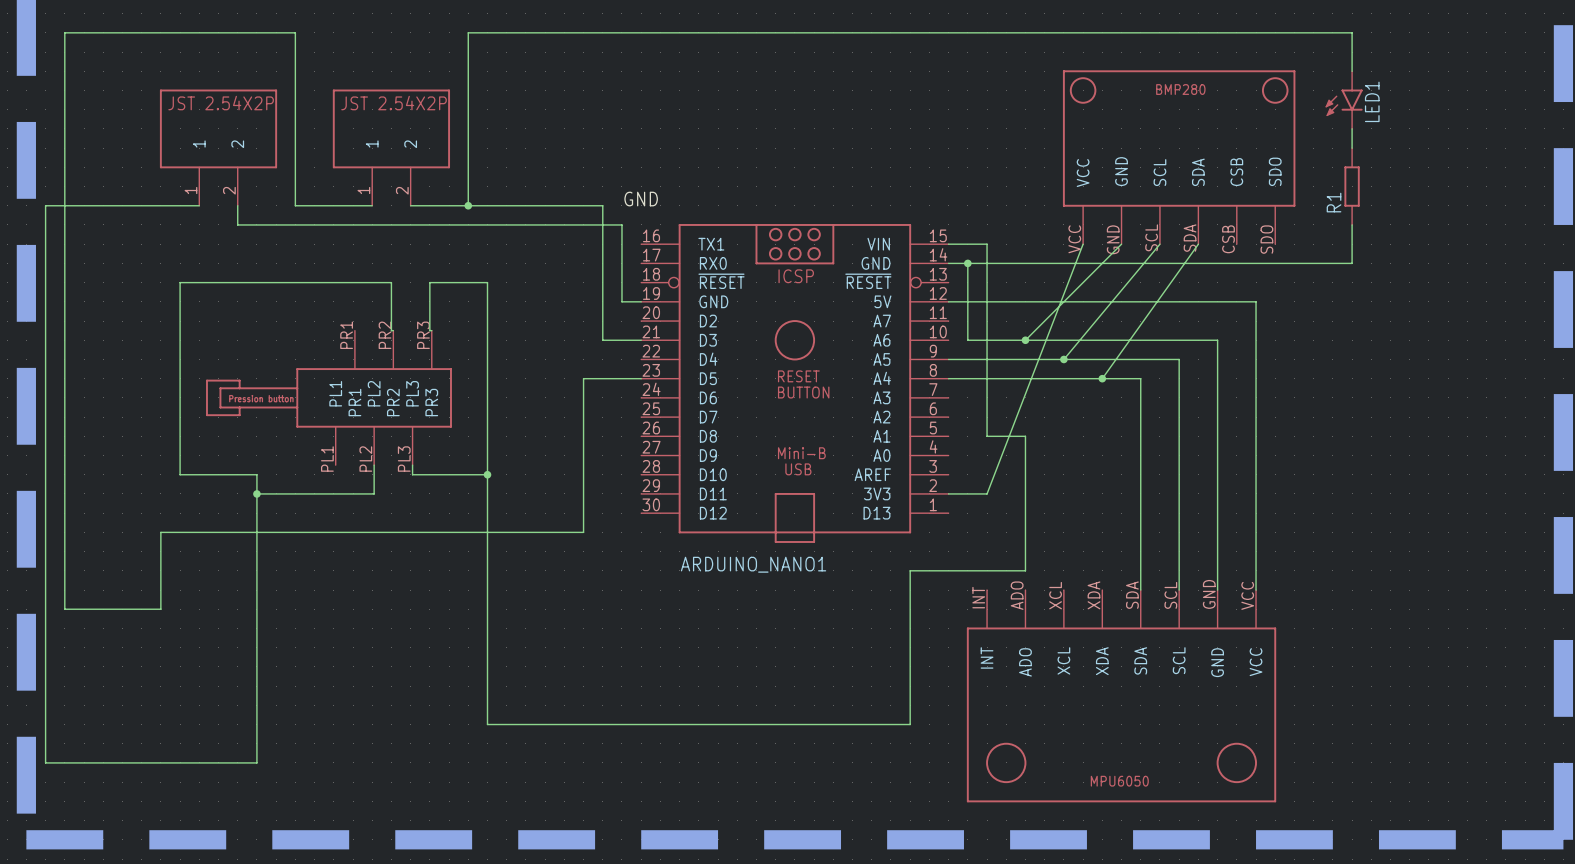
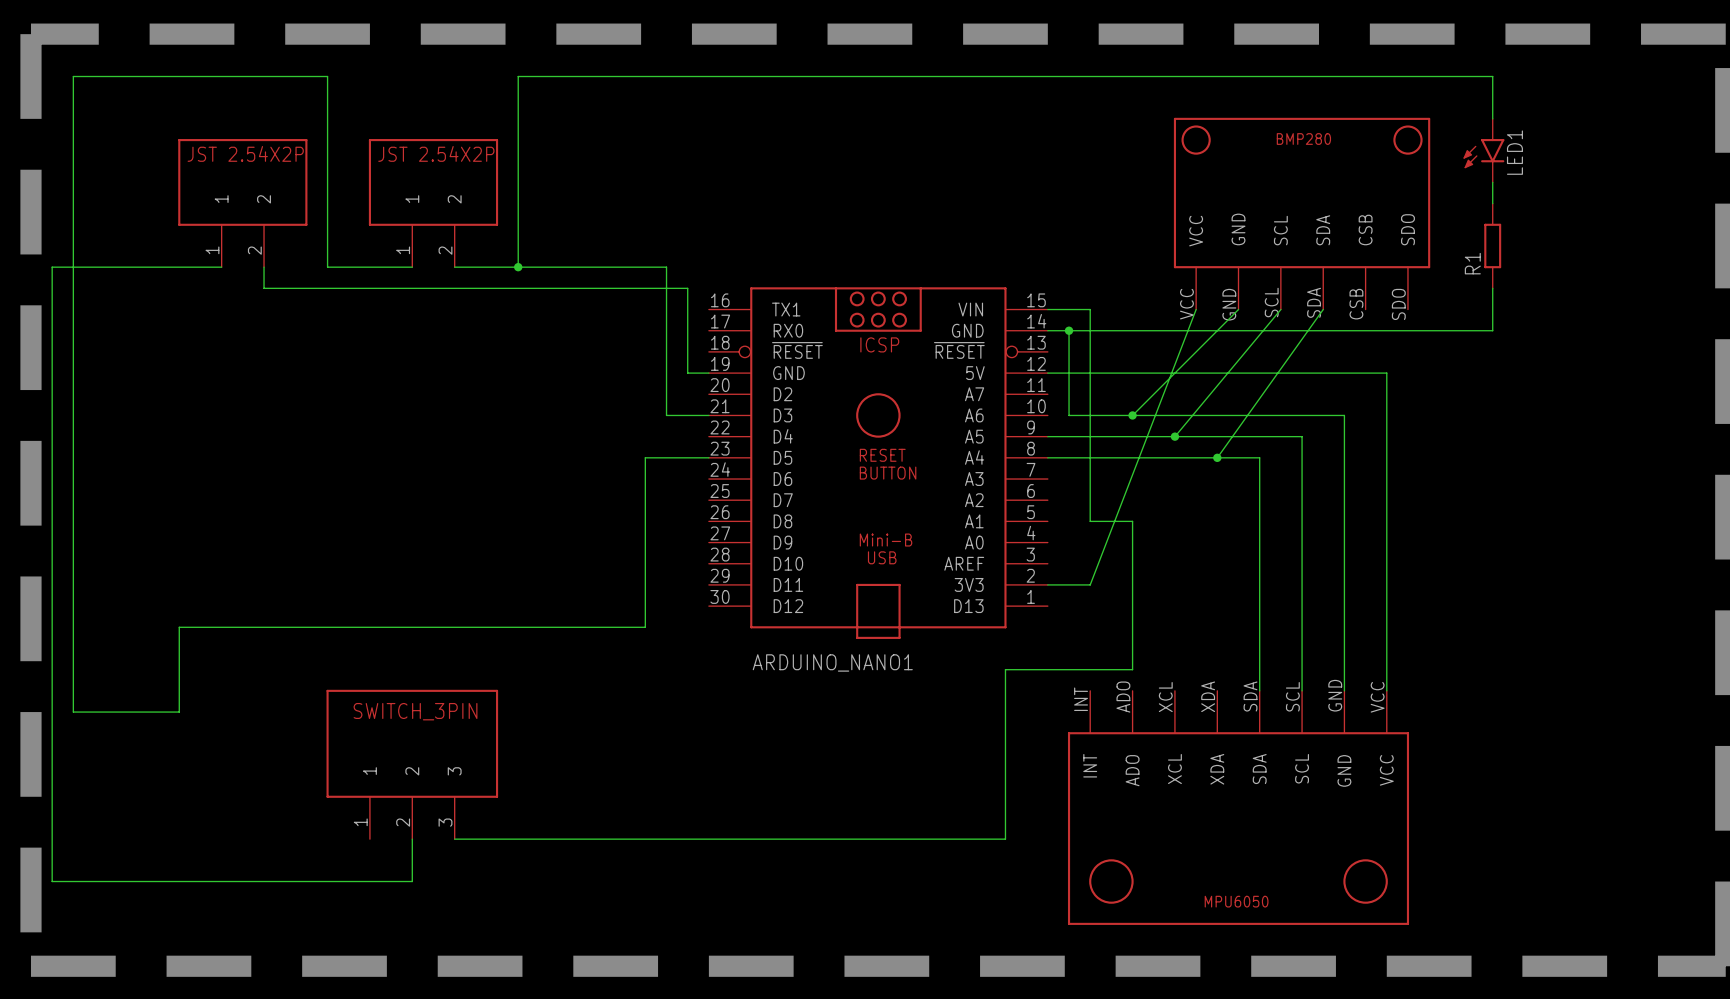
label: GND (641, 199) -> none
wire: (393, 330) (391, 330) (391, 282) (180, 282) (180, 474) (256, 474) (256, 762) -> (412, 839) (412, 881) (285, 881)
wire: (431, 330) (429, 330) (429, 282) (487, 282) (487, 724) -> (454, 839) (539, 839)
part: (328, 397) -> none
wire: (374, 465) (374, 493) (256, 493) -> none
wire: (412, 465) (412, 474) (487, 474) -> none
junction: (487, 474) -> none
junction: (256, 493) -> none
part: none -> (412, 764)

